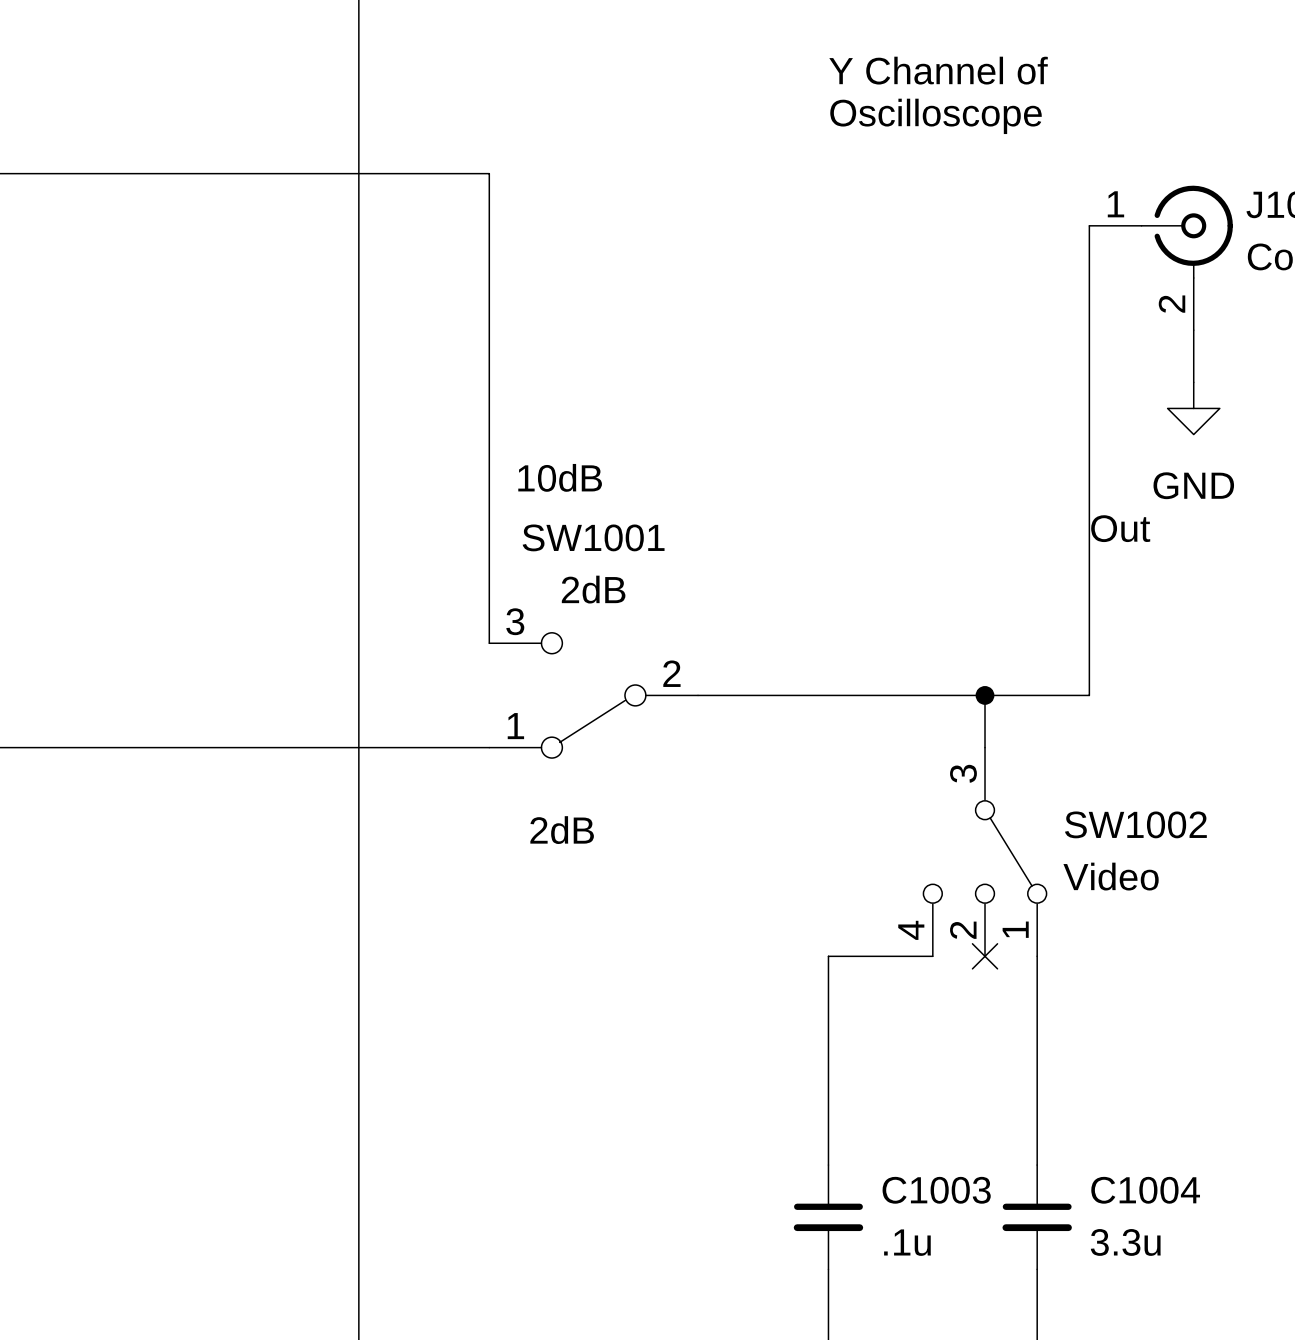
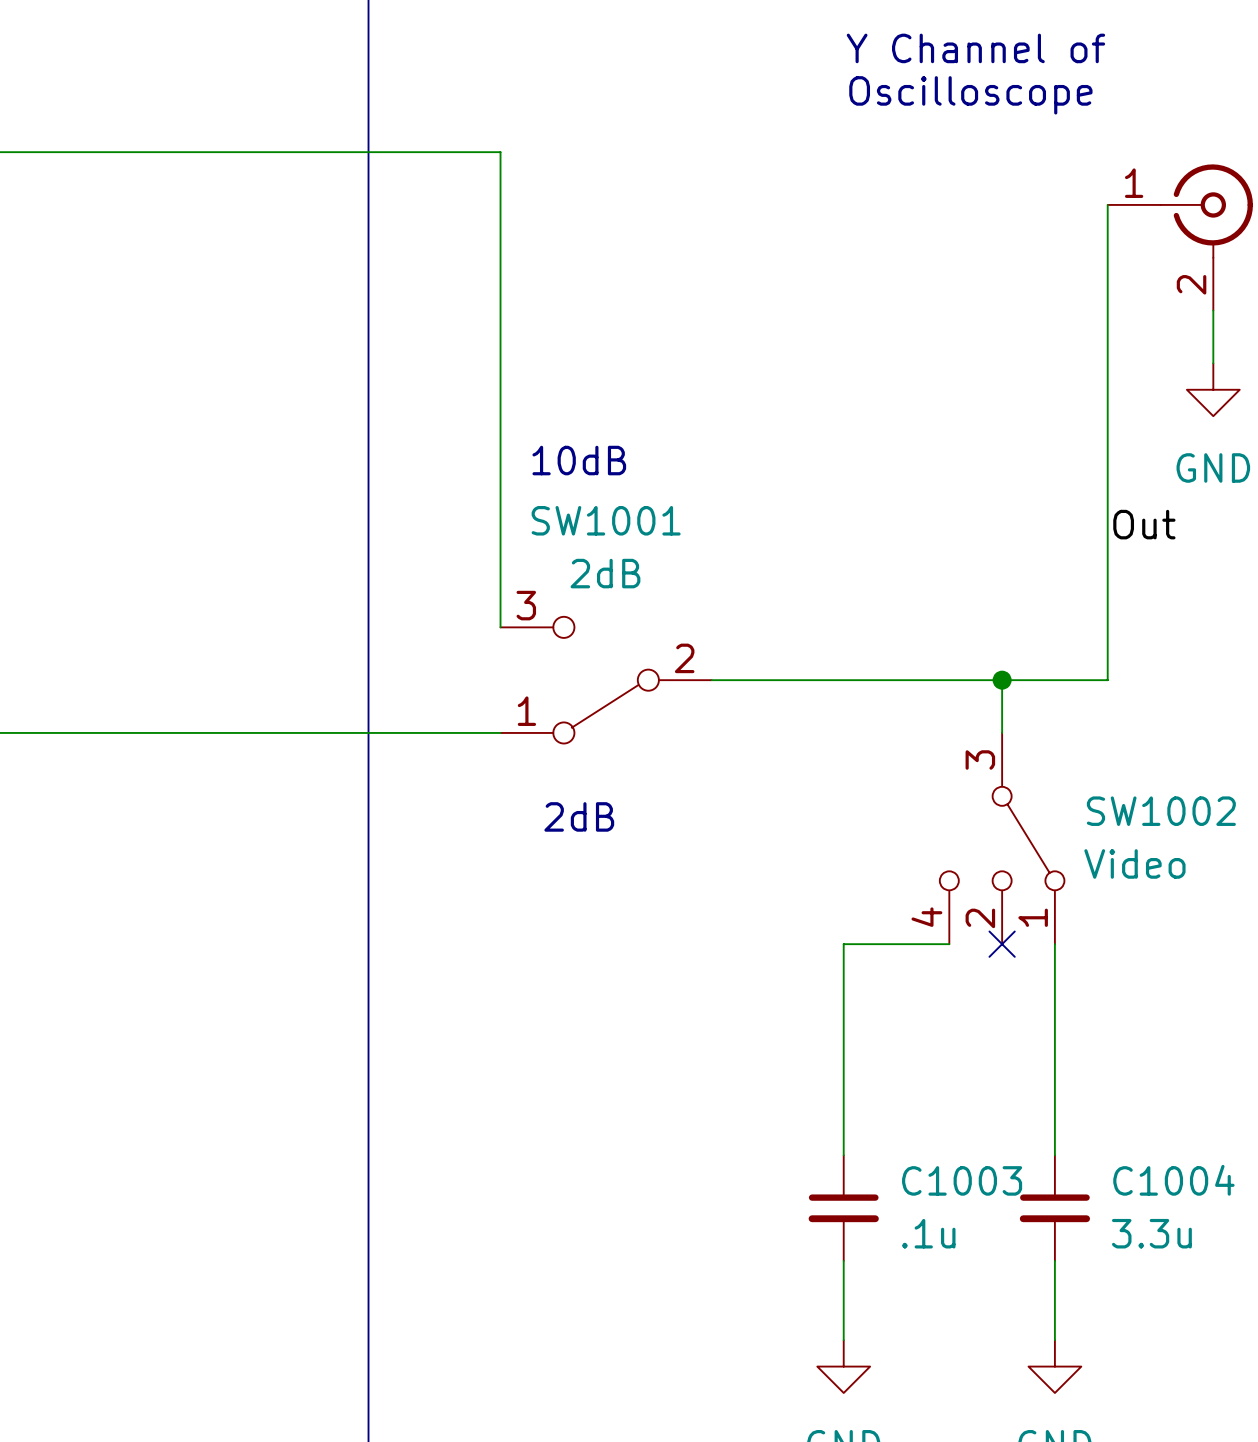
label position: Out (1120, 528) -> Out (1144, 524)

